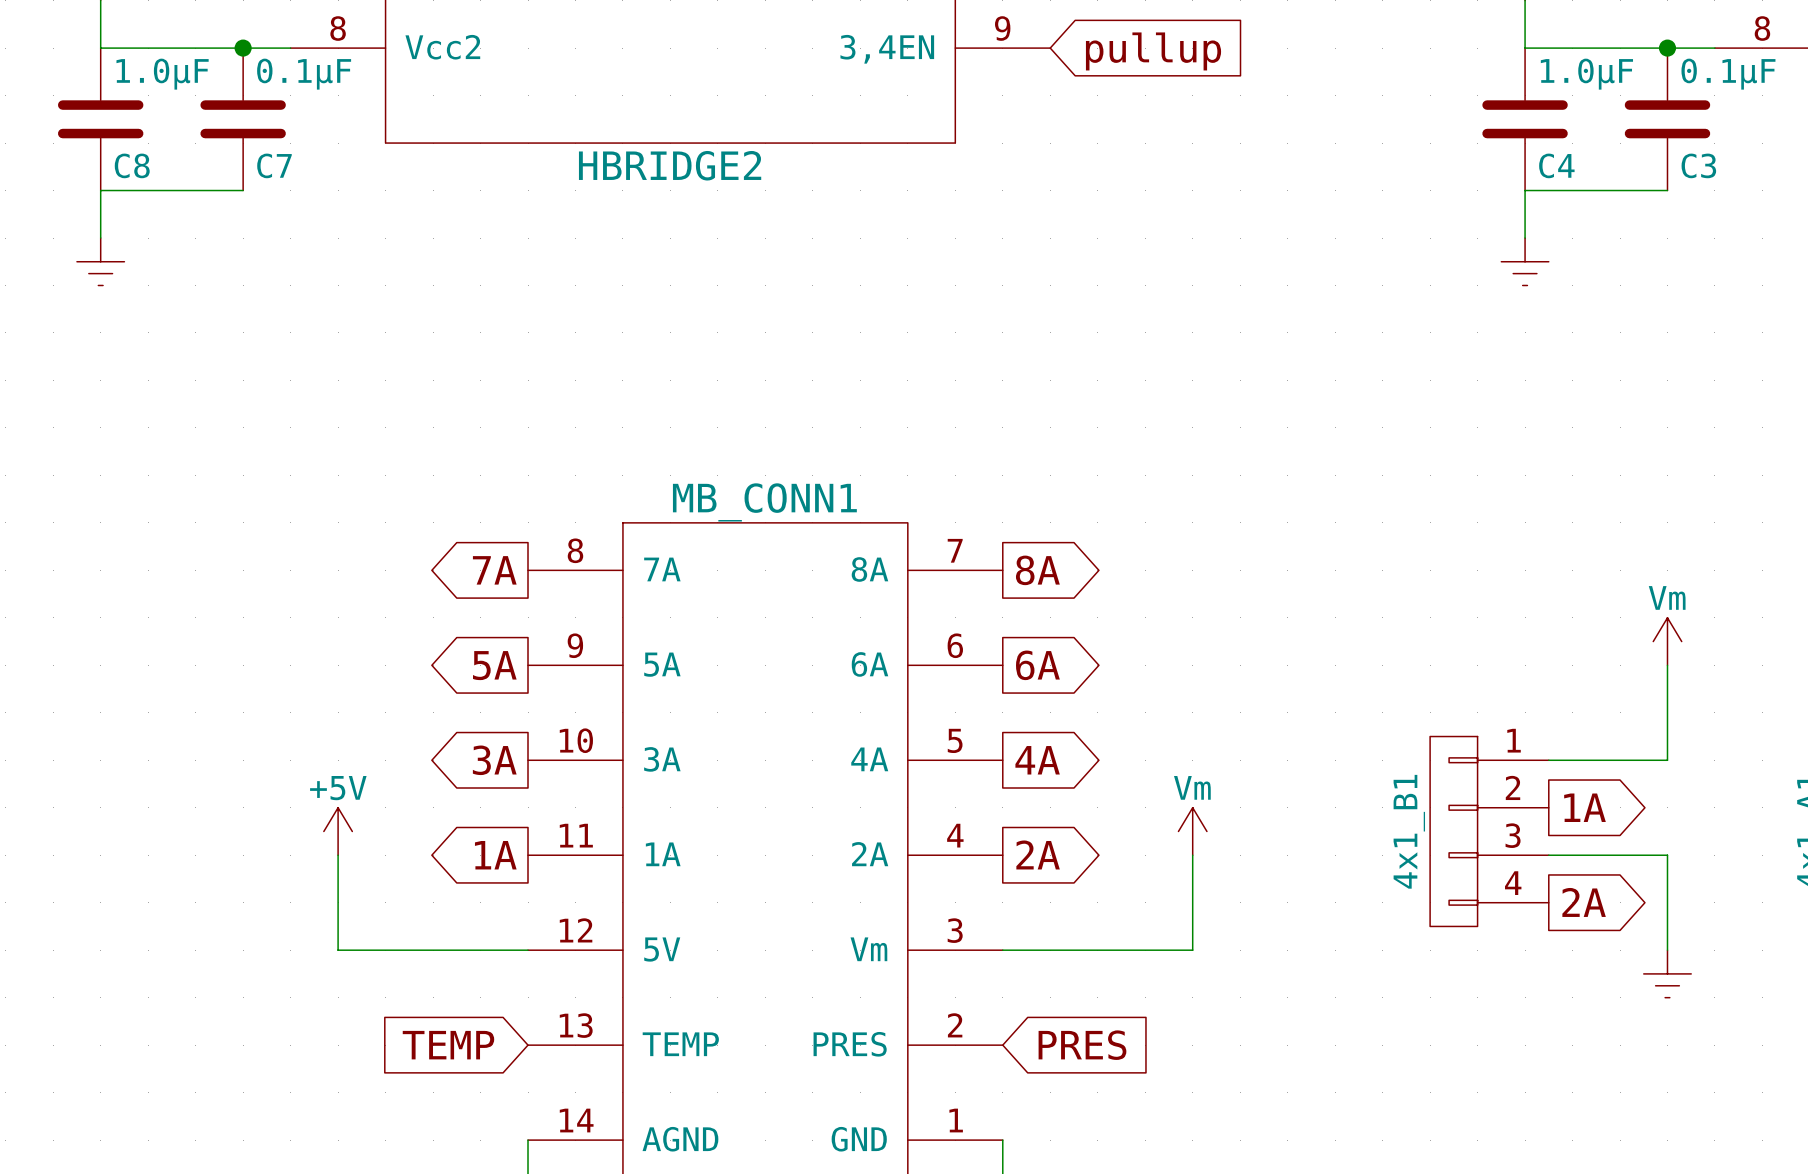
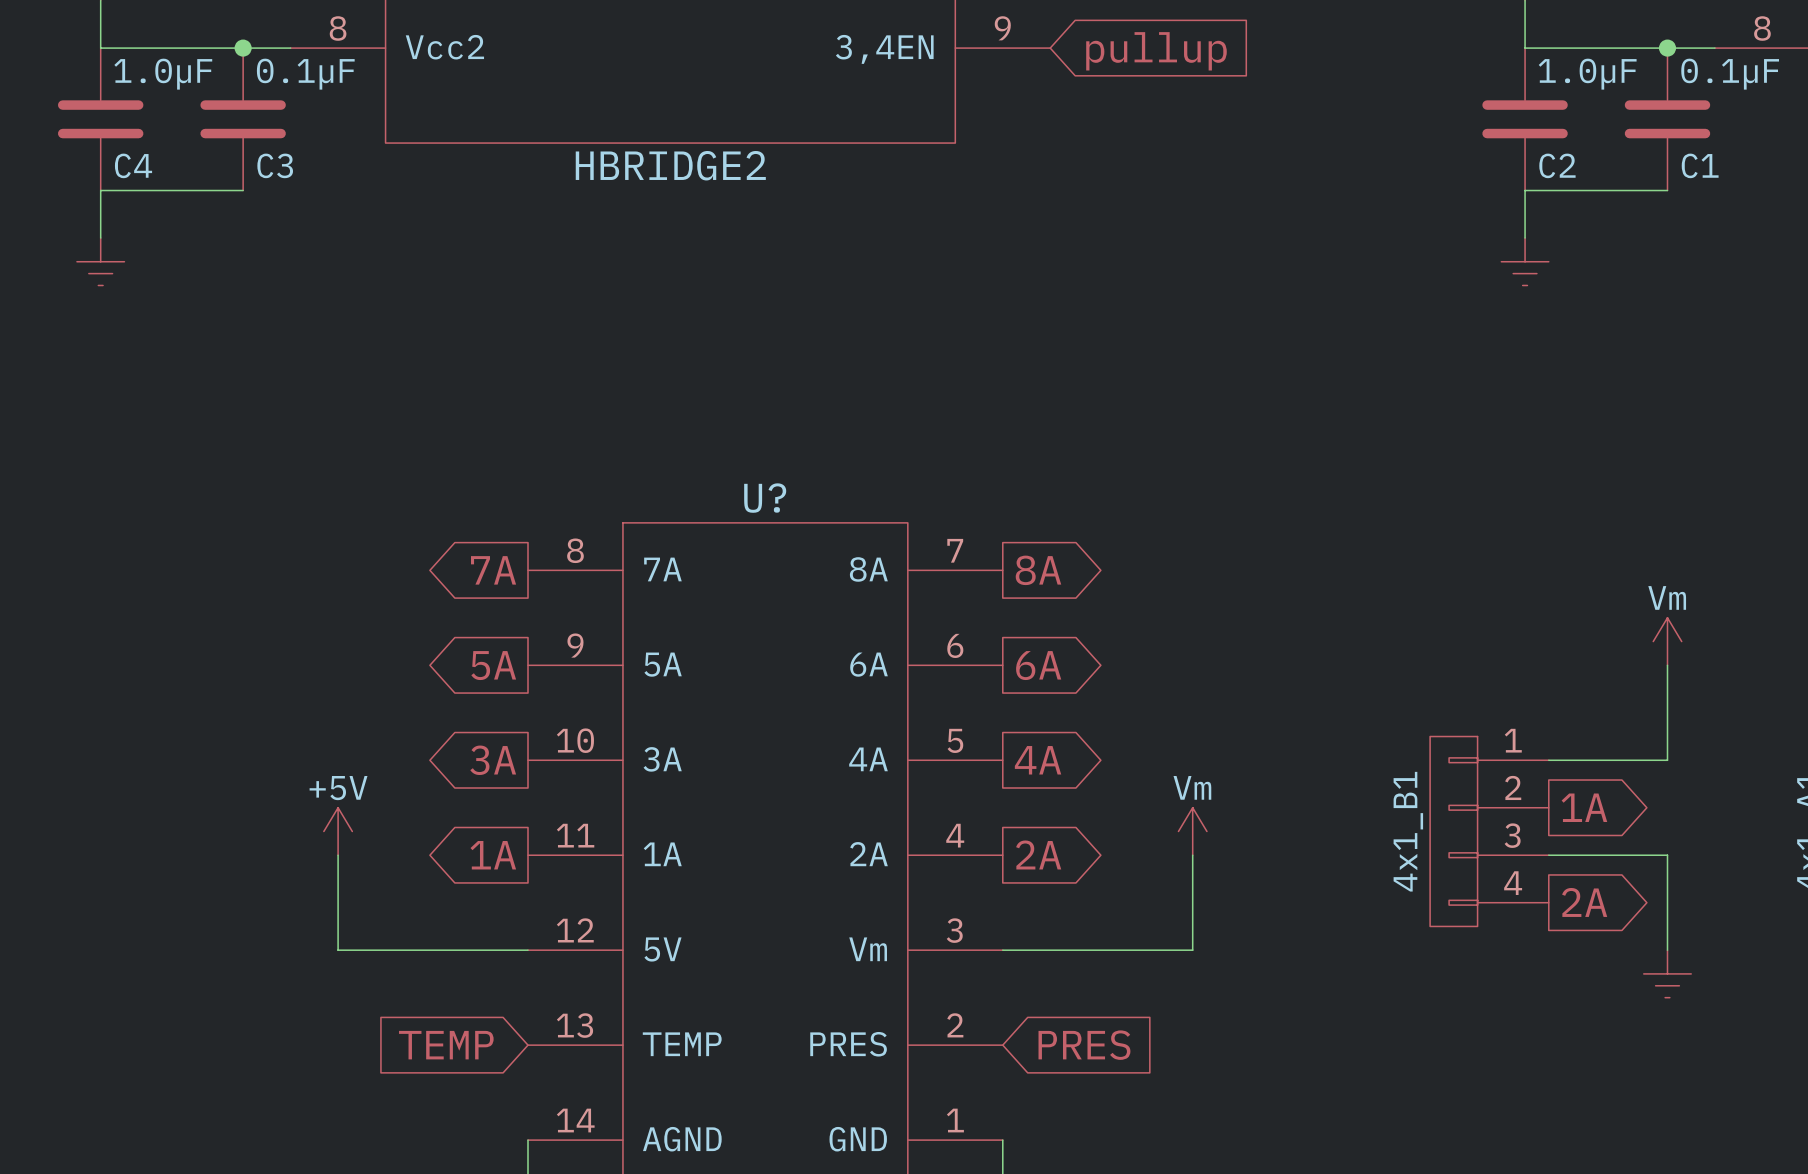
C8 name: C8 (132, 165) -> C4 (133, 165)
C7 name: C7 (274, 165) -> C3 (275, 165)
C4 name: C4 (1556, 165) -> C2 (1557, 165)
C3 name: C3 (1698, 165) -> C1 (1700, 165)
MB_CONN1 name: MB_CONN1 (764, 502) -> U? (765, 498)

